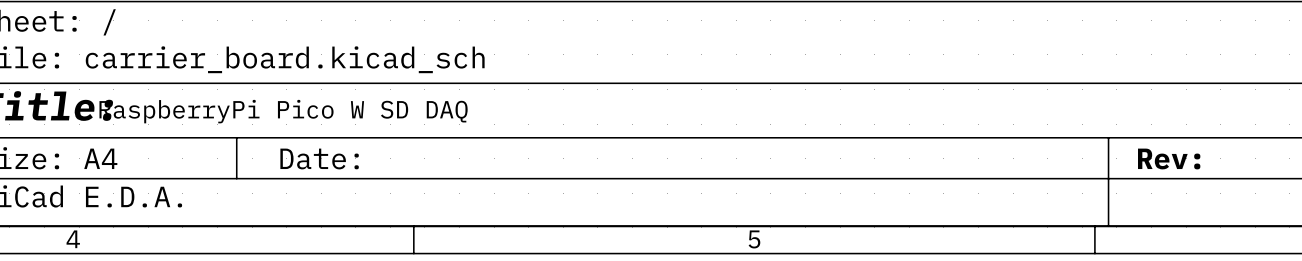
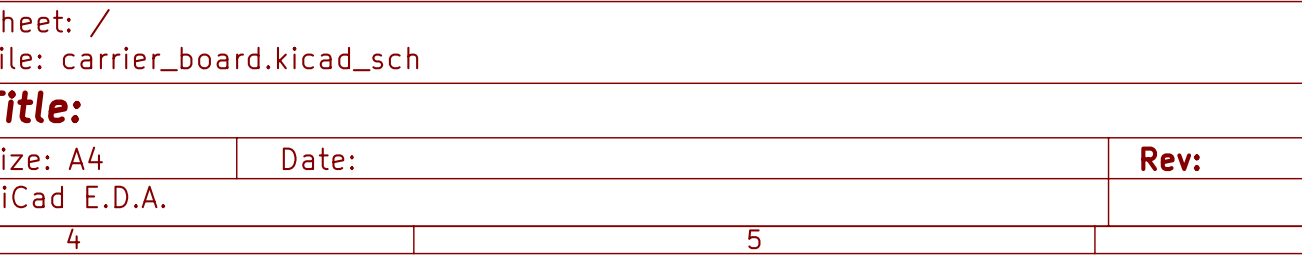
text: RaspberryPi Pico W SD DAQ (283, 111) -> none

